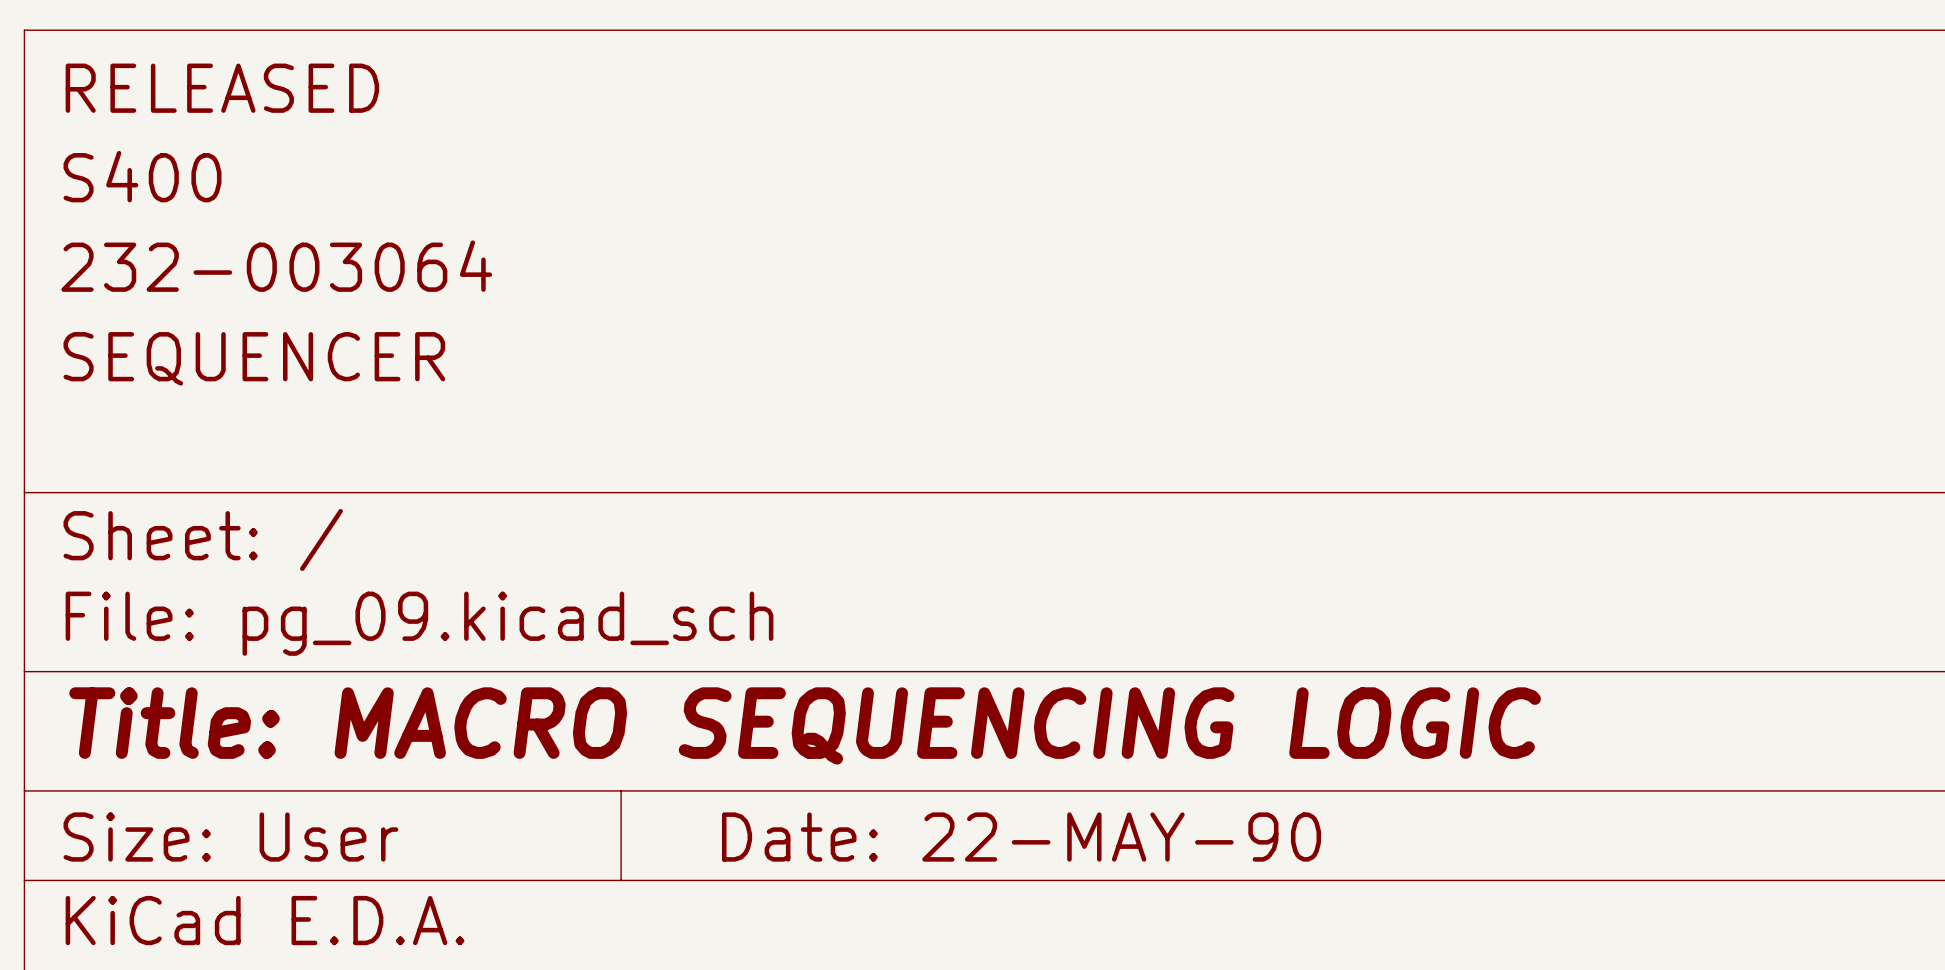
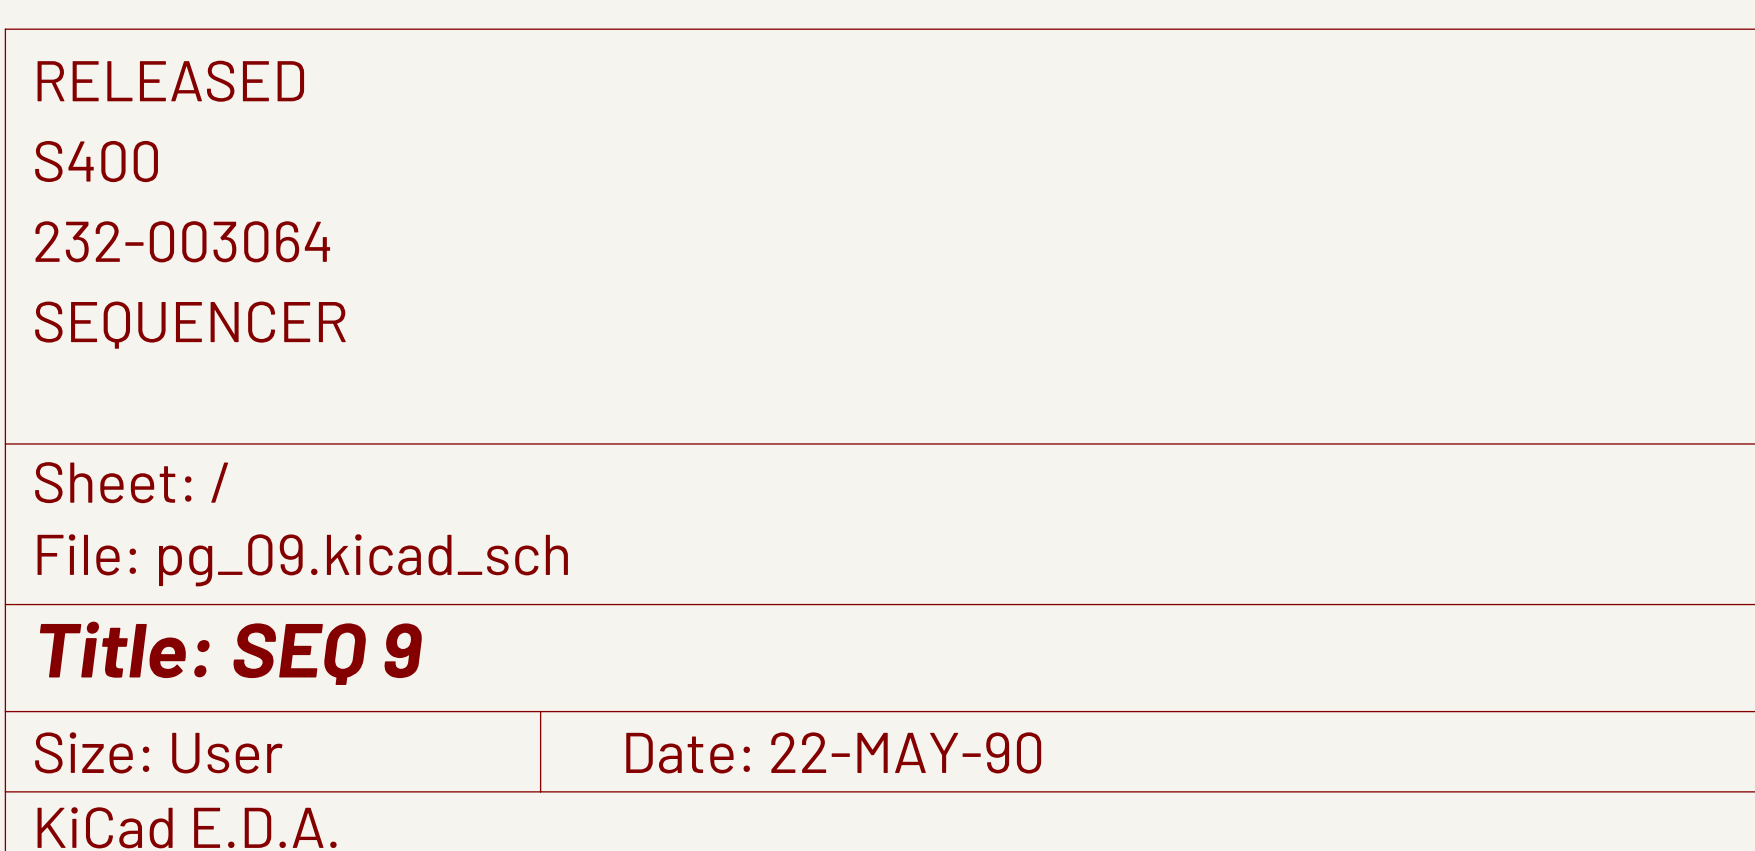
title block: Title: MACRO SEQUENCING LOGIC (805, 725) -> Title: SEQ 9 (231, 653)

